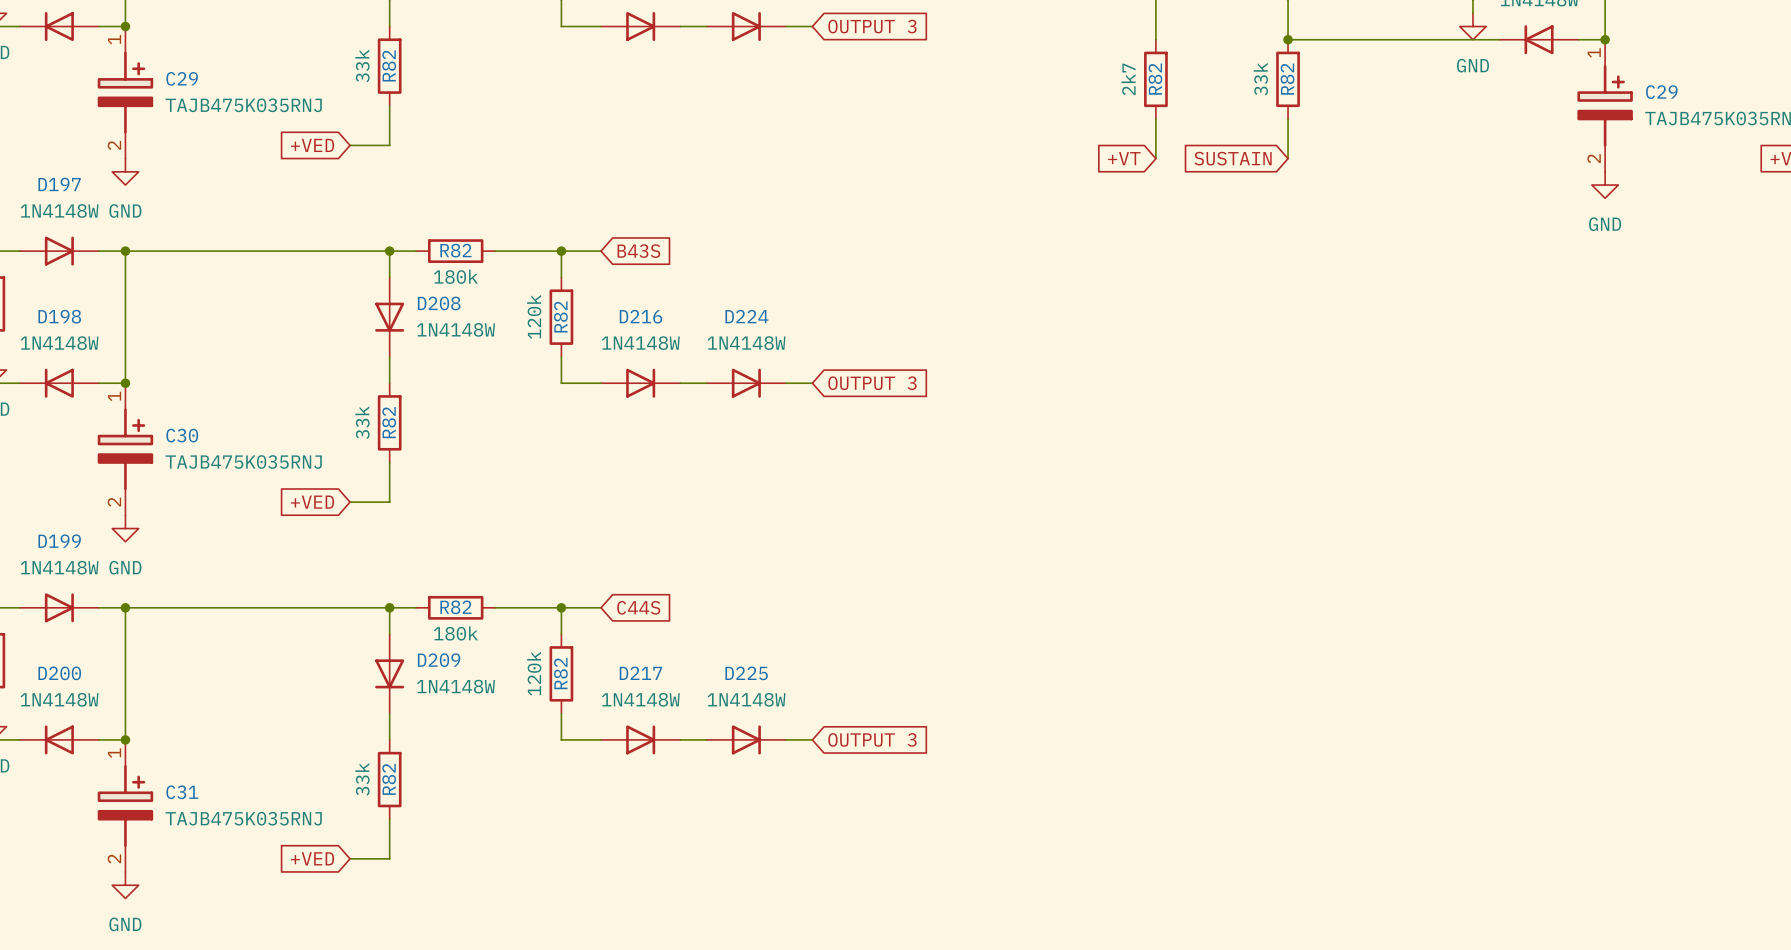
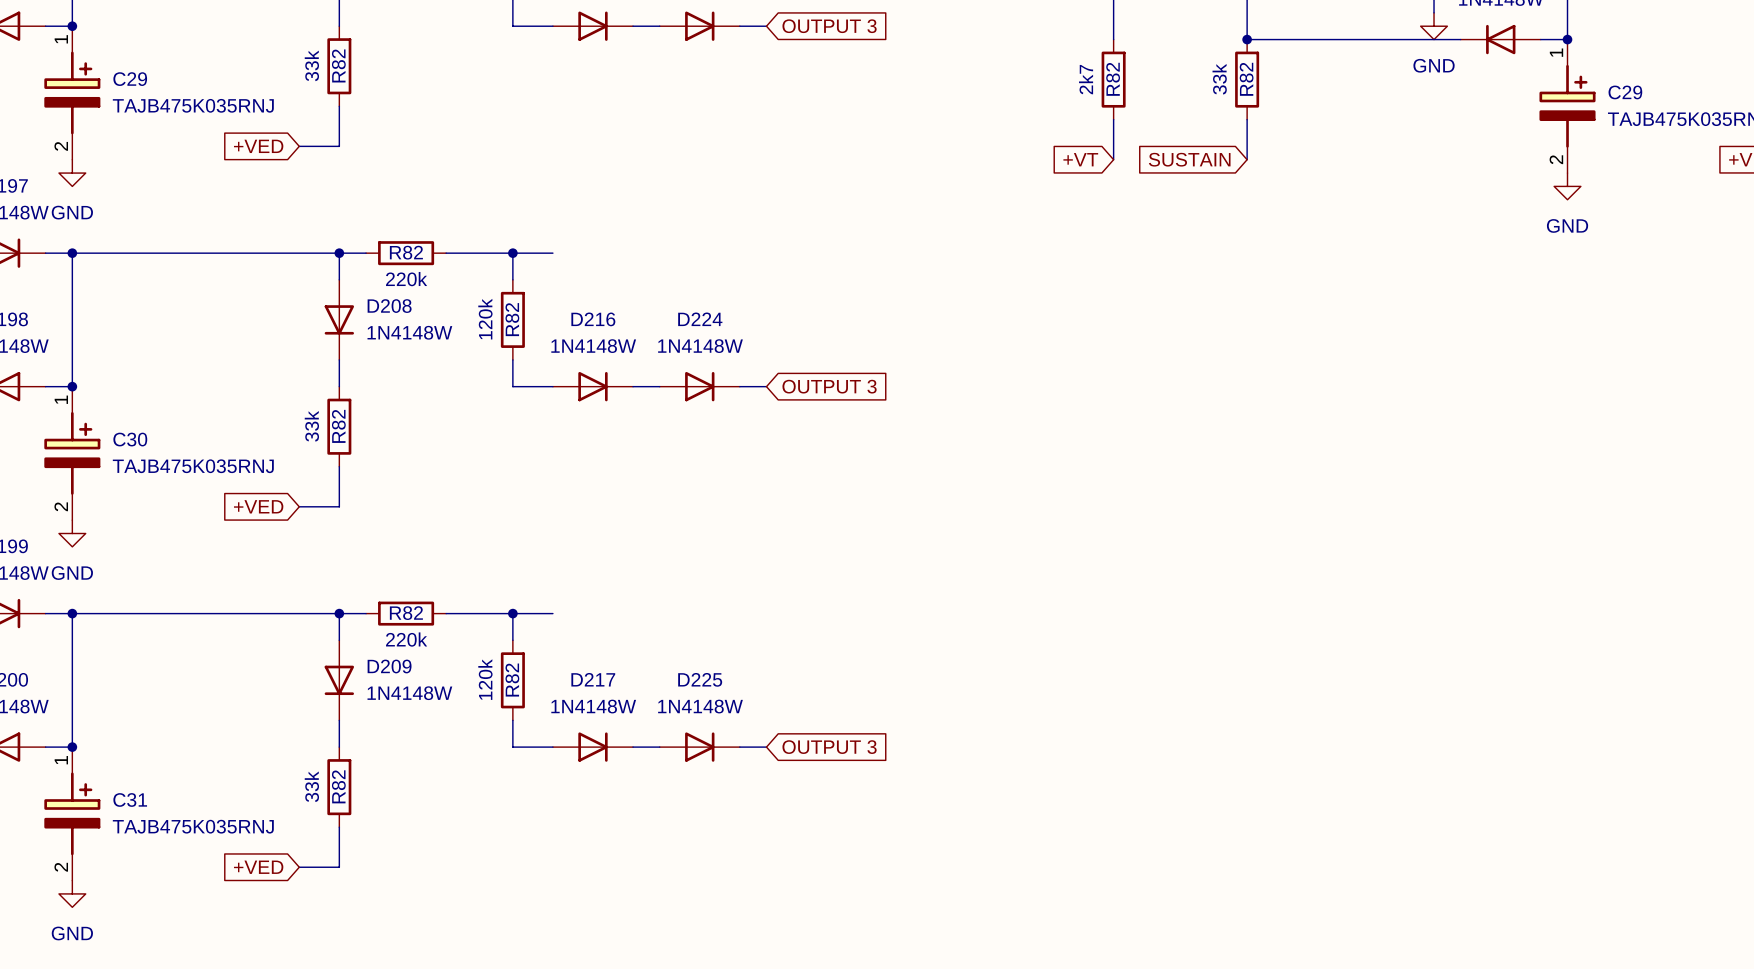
global label: B43S (638, 251) -> none
R82 value: 180k (455, 276) -> 220k (406, 279)
global label: C44S (638, 607) -> none
R82 value: 180k (455, 633) -> 220k (406, 639)

